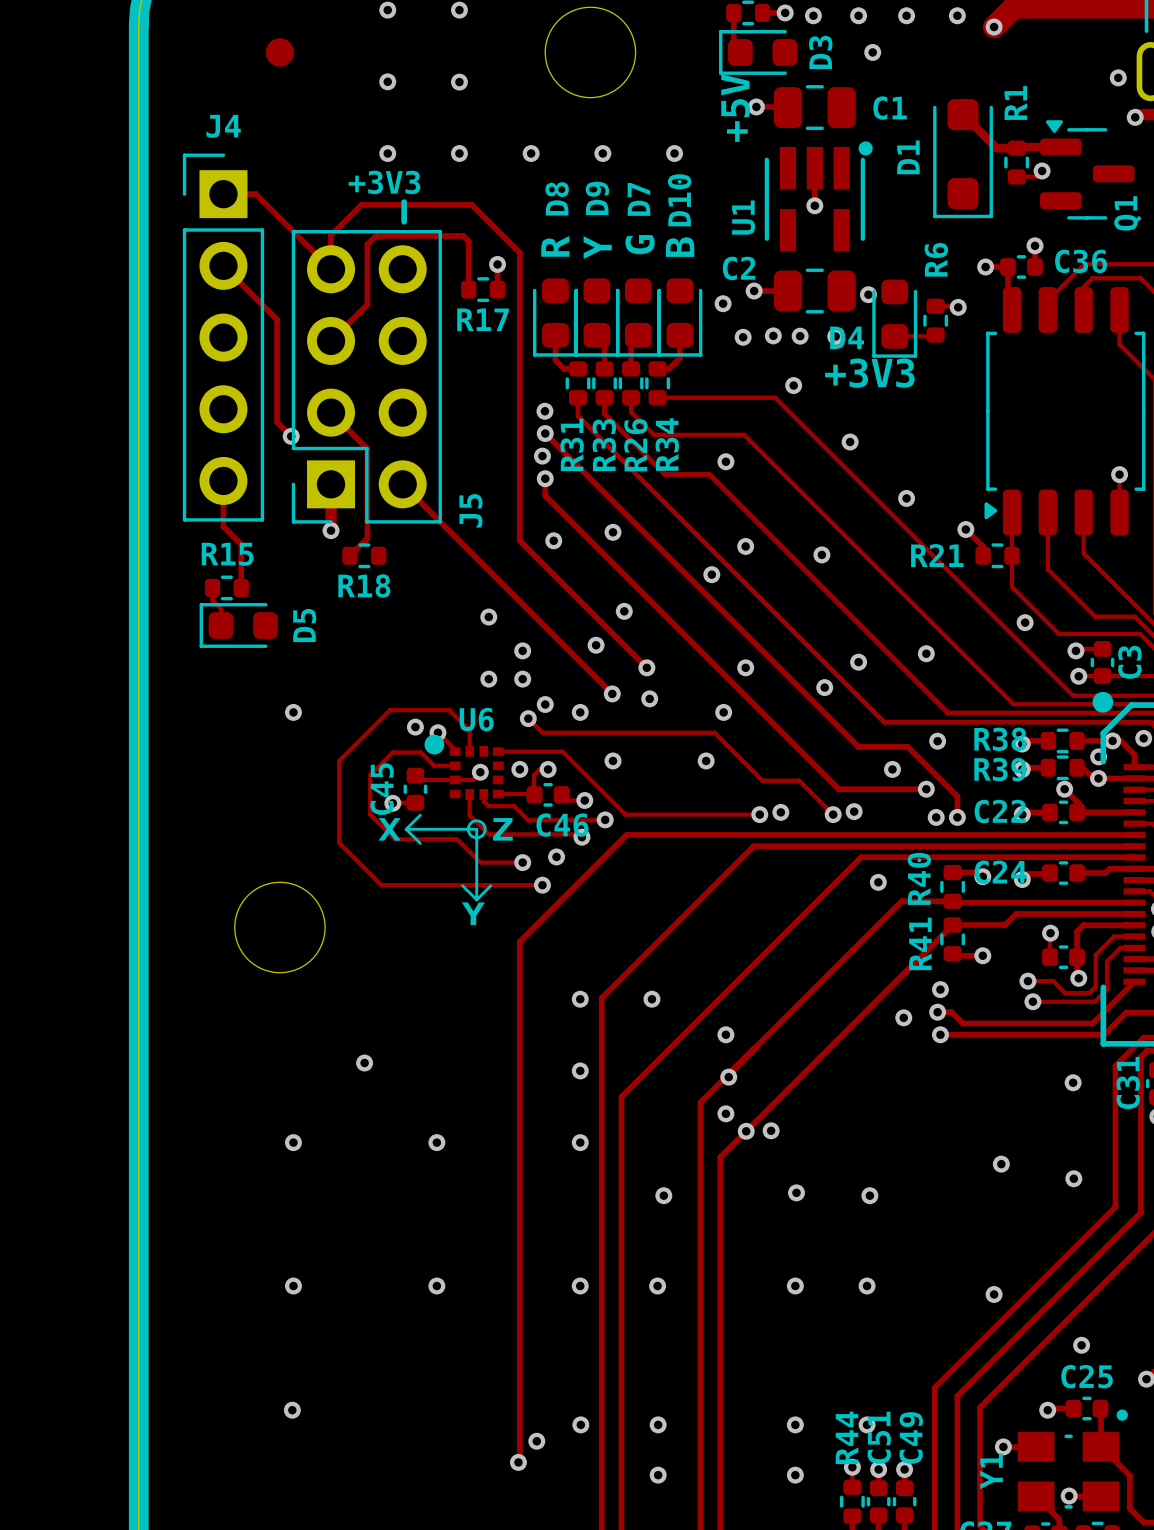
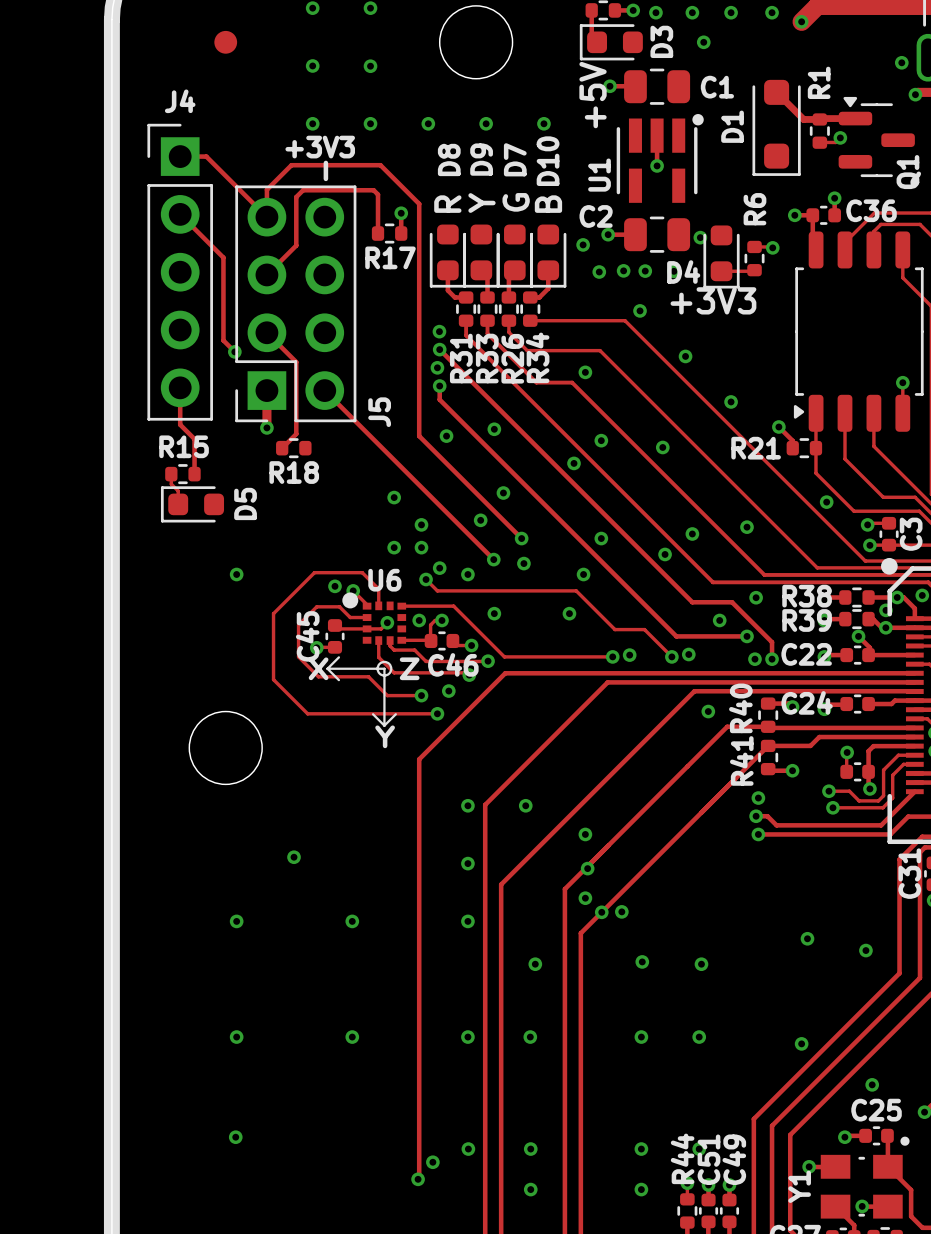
via: (903, 1017) -> none
via: (1073, 1082) -> none

